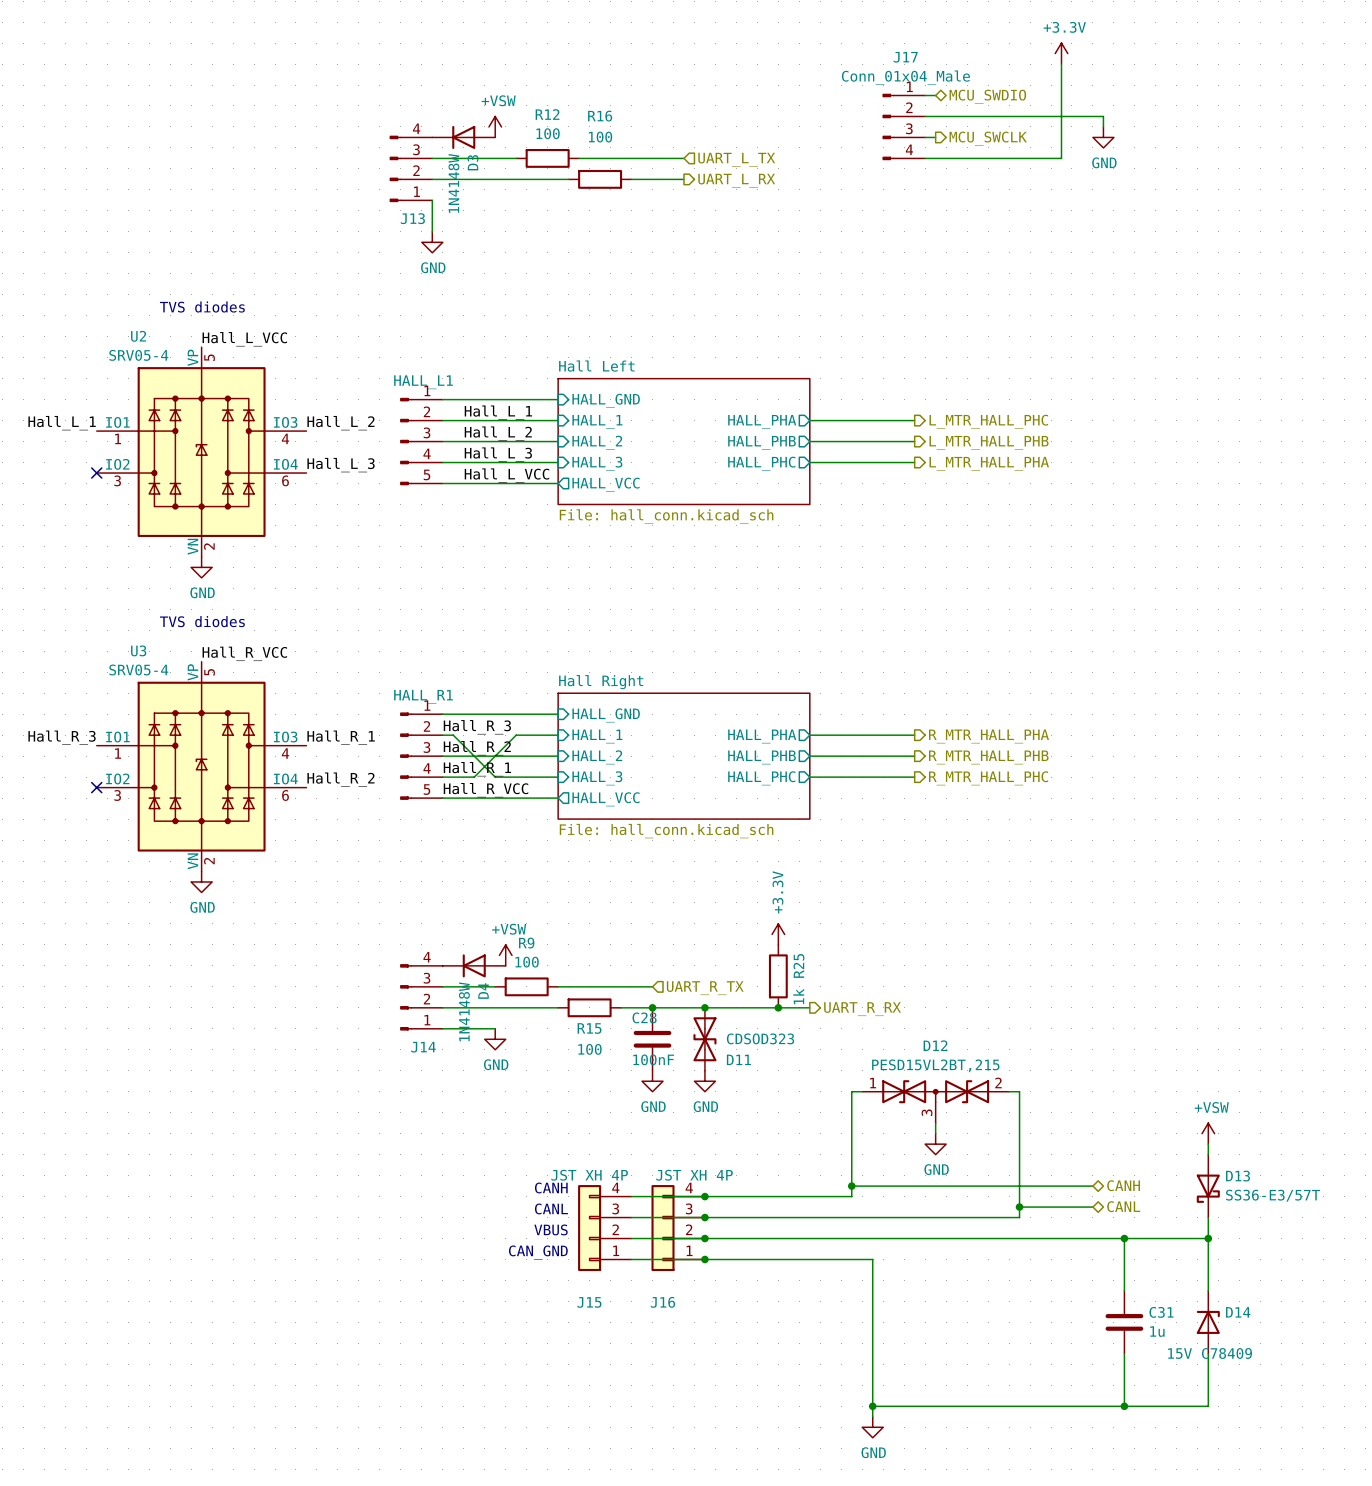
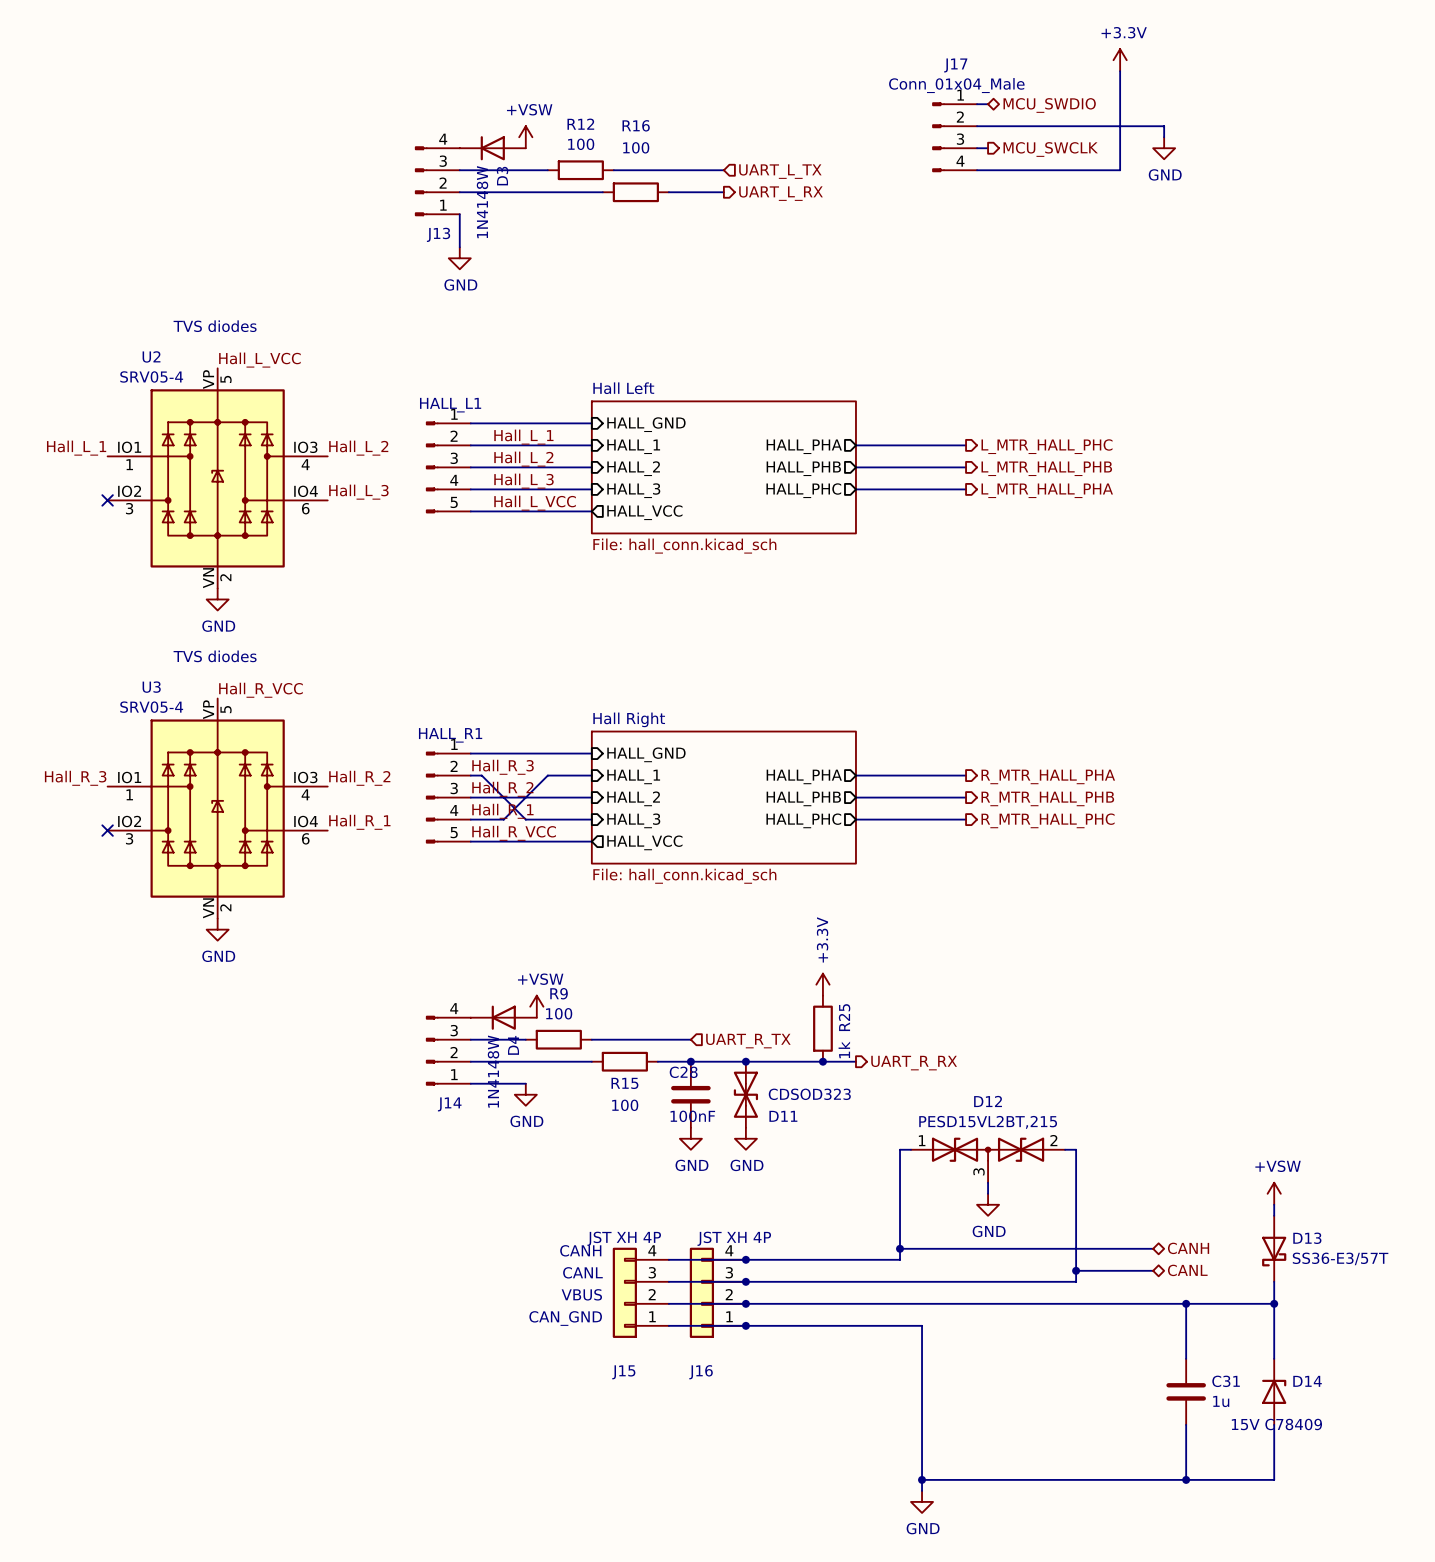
label: Hall_R_1 (341, 737) -> Hall_R_2 (359, 778)
label: Hall_R_2 (340, 779) -> Hall_R_1 (359, 822)

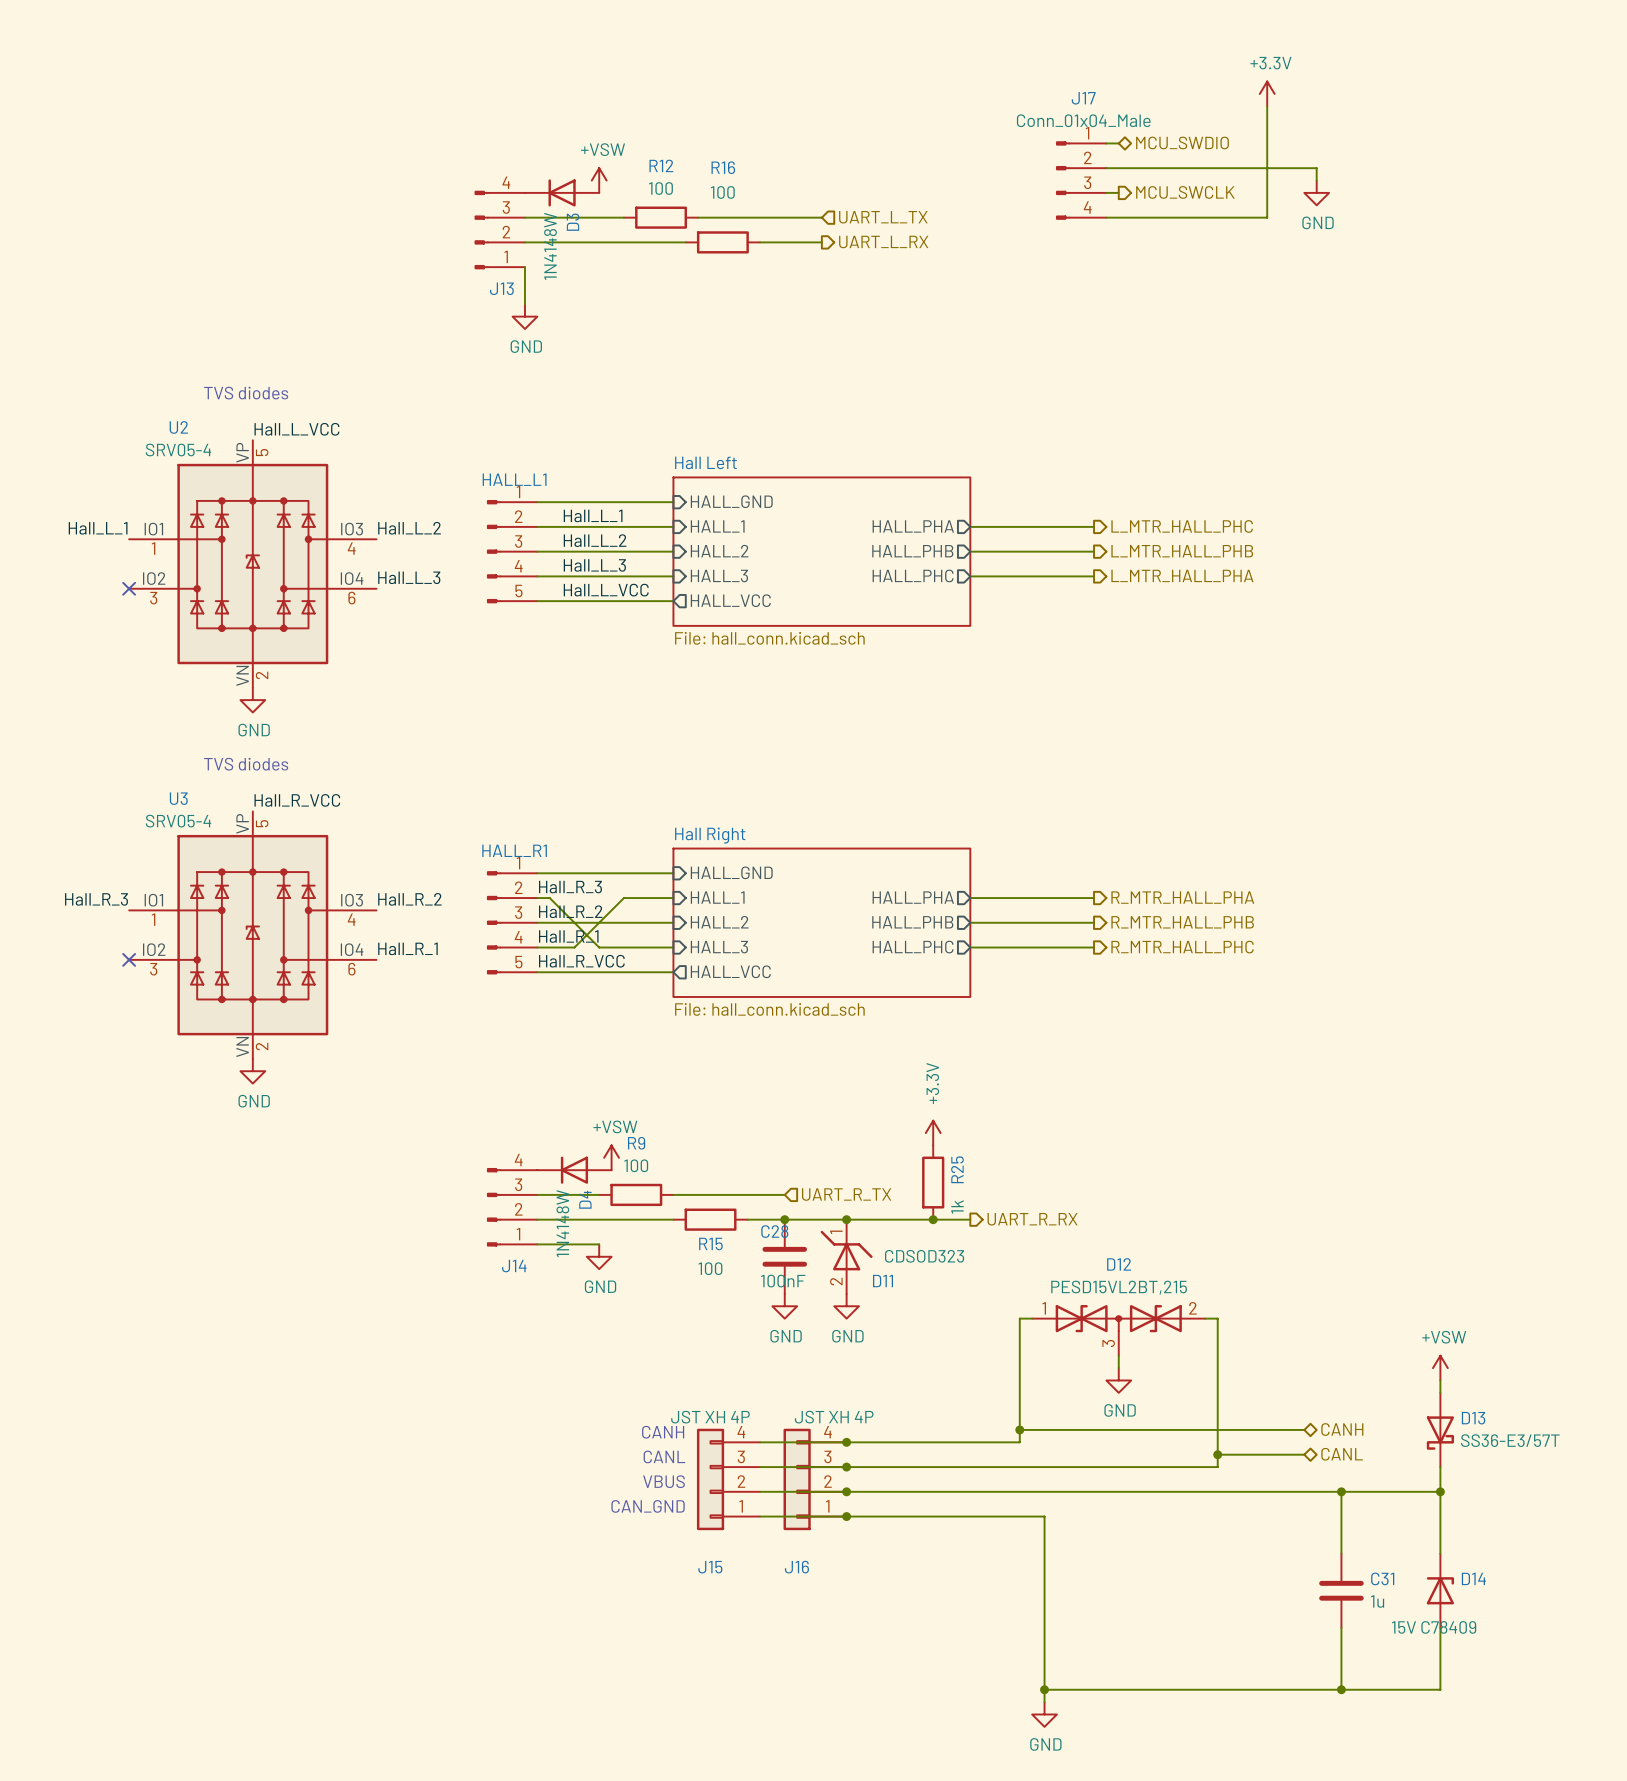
D11 symbol: [733, 1061, 759, 1128] -> [820, 1219, 873, 1294]

